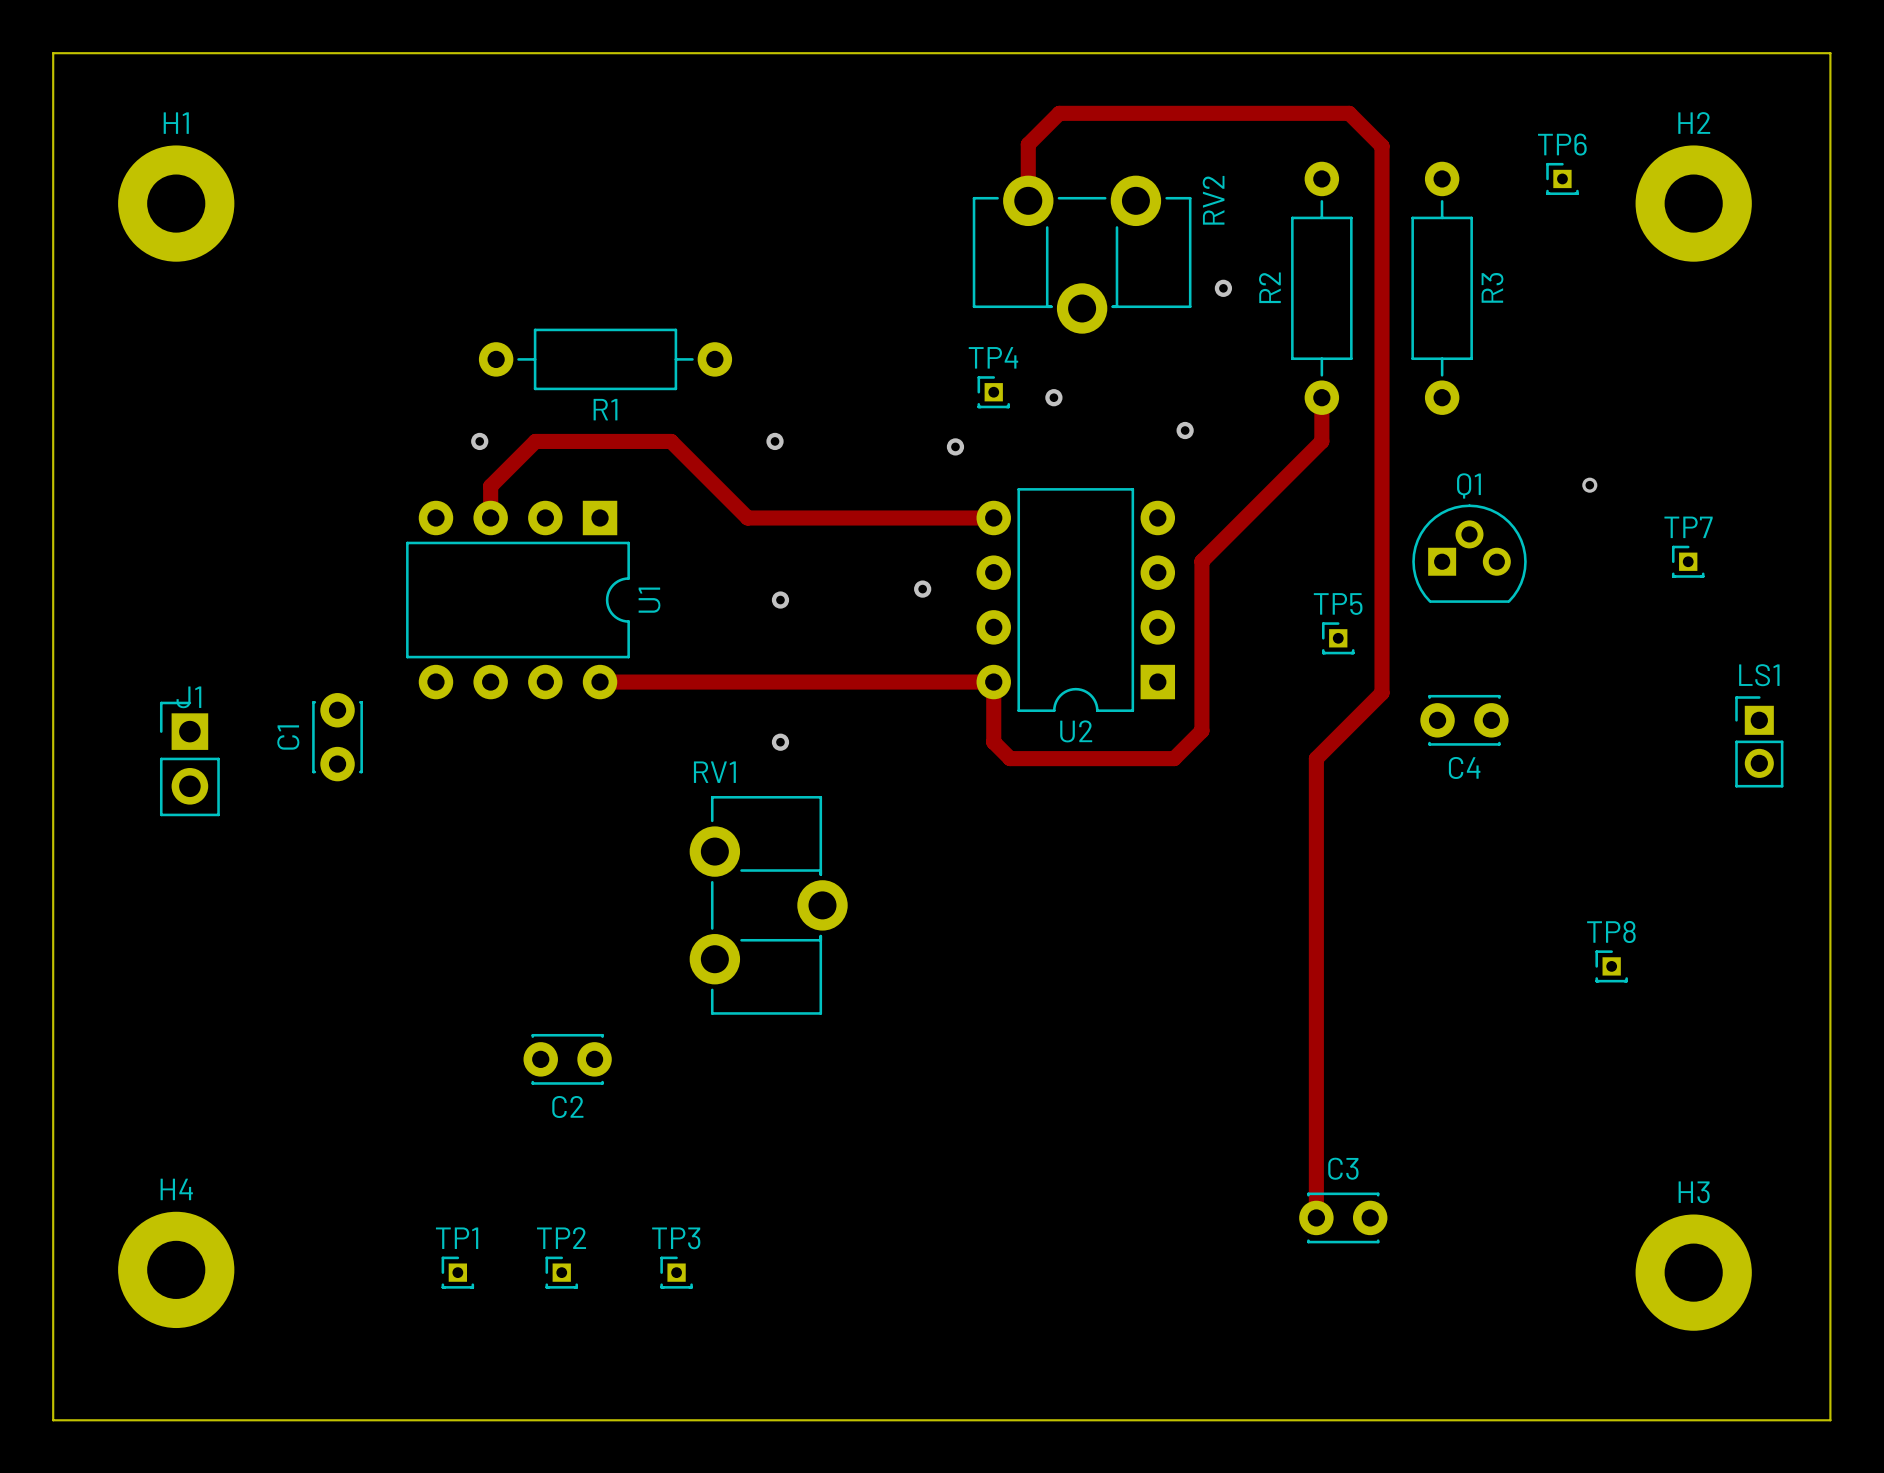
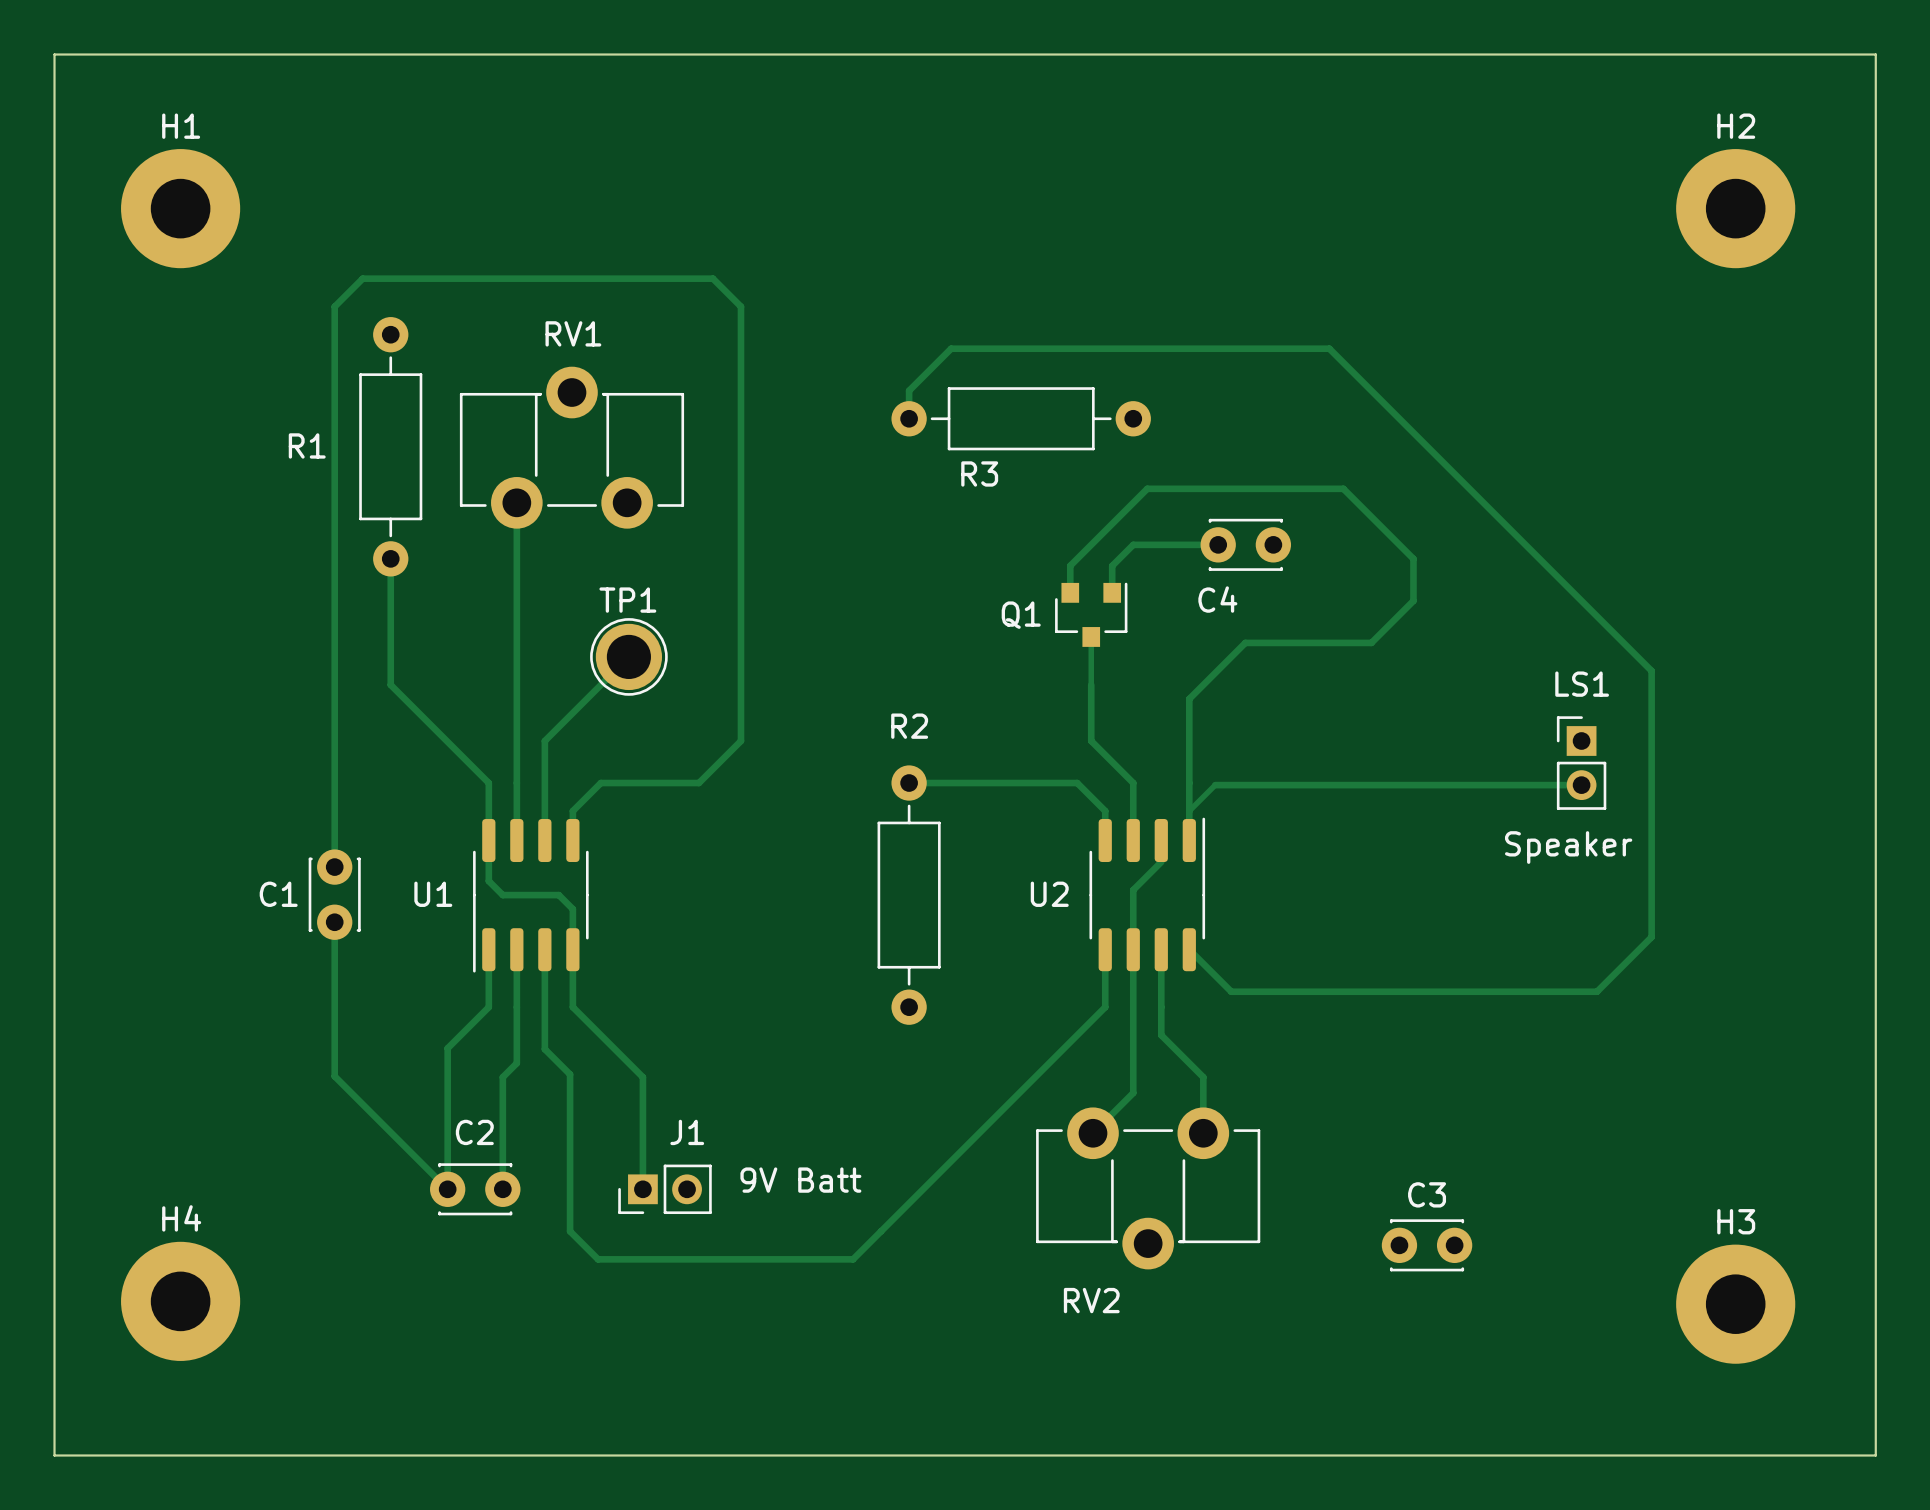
TP6: (1562, 178) -> none
track: (1028, 200) (1028, 144) (1059, 113) (1349, 113) (1382, 146) (1382, 692) (1316, 758) (1316, 1217) -> none
RV2 name rotation: 0° (1213, 200) -> 90° clockwise (1091, 1300)
RV2 name position: RV2 (1213, 200) -> RV2 (1091, 1300)
RV2 position: (1082, 254) -> (1148, 1188)
R2 name rotation: 0° (1269, 287) -> 90° clockwise (909, 726)
R2 name position: R2 (1269, 287) -> R2 (909, 726)
via: (1223, 288) -> none
R2 position: (1321, 288) -> (909, 895)
R3 rotation: 0° (1442, 288) -> 90° clockwise (1021, 418)
R3 position: (1442, 288) -> (1021, 418)
R1 rotation: 0° (605, 359) -> 90° clockwise (390, 446)
R1 position: (605, 359) -> (390, 446)
TP4: (993, 392) -> none
via: (1053, 397) -> none
track: (1321, 397) (1321, 441) (1201, 561) (1201, 730) (1174, 758) (1010, 758) (993, 742) (993, 682) (600, 682) -> none
track: none -> (909, 418) (909, 390) (951, 348) (1329, 348) (1651, 670) (1651, 937) (1597, 991) (1231, 991) (1189, 949)
via: (1185, 430) -> none
via: (479, 441) -> none
via: (775, 441) -> none
via: (955, 446) -> none
Q1 name position: Q1 (1468, 485) -> Q1 (1021, 615)
via: (1589, 485) -> none
U2 footprint: [976, 488, 1176, 712] -> [1089, 817, 1206, 972]
track: none -> (516, 502) (516, 840)
U1 footprint: [406, 500, 630, 700] -> [473, 818, 589, 973]
Q1 footprint: [1412, 504, 1527, 603] -> [1055, 582, 1128, 647]
track: (490, 518) (490, 486) (535, 441) (671, 441) (747, 518) (993, 518) -> none
track: none -> (1218, 544) (1133, 544) (1112, 565) (1112, 592)
track: none -> (390, 558) (390, 684) (488, 783) (488, 881) (502, 895) (558, 895) (572, 909) (572, 1007) (642, 1077) (642, 1189)
TP7: (1688, 561) -> none
track: none -> (1070, 592) (1070, 565) (1147, 488) (1343, 488) (1413, 558) (1413, 600) (1371, 642) (1245, 642) (1189, 698) (1189, 840)
via: (922, 589) -> none
U1 name position: U1 (649, 600) -> U1 (433, 894)
via: (780, 600) -> none
track: none -> (1091, 636) (1091, 740) (1133, 783) (1133, 840)
TP5: (1338, 638) -> none
track: none -> (628, 656) (544, 740) (544, 840)
LS1 name position: LS1 (1759, 675) -> LS1 (1582, 684)
J1 footprint: [159, 701, 220, 817] -> [618, 1164, 712, 1215]
C4 position: (1464, 720) -> (1245, 544)
U2 name position: U2 (1076, 731) -> U2 (1049, 894)
C1 name rotation: 0° (288, 737) -> 90° clockwise (278, 894)
C1 position: (337, 737) -> (334, 894)
LS1 position: (1759, 741) -> (1581, 763)
via: (780, 742) -> none
track: none -> (909, 783) (1077, 783) (1105, 811) (1105, 840)
track: none -> (1581, 785) (1215, 785) (1189, 811)
C4 name position: C4 (1464, 767) -> C4 (1217, 599)
RV1 name position: RV1 (714, 772) -> RV1 (573, 333)
track: none -> (572, 840) (572, 811) (600, 783) (698, 783) (740, 740) (740, 306) (712, 278) (362, 278) (334, 306) (334, 867)
track: none -> (1161, 840) (1161, 862) (1133, 890) (1133, 1093) (1093, 1133)
text: none -> Speaker (1568, 847)
track: none -> (334, 922) (334, 1076) (447, 1189) (447, 1048) (488, 1007) (488, 949)
RV1 rotation: 0° (768, 905) -> 90° counterclockwise (571, 447)
RV1 position: (768, 905) -> (571, 447)
track: none -> (516, 949) (516, 1063) (502, 1077) (502, 1189)
track: none -> (544, 949) (544, 1049) (570, 1074) (570, 1231) (598, 1259) (853, 1259) (1105, 1007) (1105, 949)
track: none -> (1161, 949) (1161, 1035) (1203, 1077) (1203, 1133)
TP8: (1611, 966) -> none
C2 position: (567, 1059) -> (475, 1189)
C2 name position: C2 (567, 1107) -> C2 (474, 1132)
text: none -> 9V Batt (800, 1180)
C3 position: (1343, 1217) -> (1427, 1245)
TP1 footprint: [441, 1256, 475, 1289] -> [590, 618, 668, 696]
TP2: (561, 1272) -> none
TP3: (676, 1272) -> none

